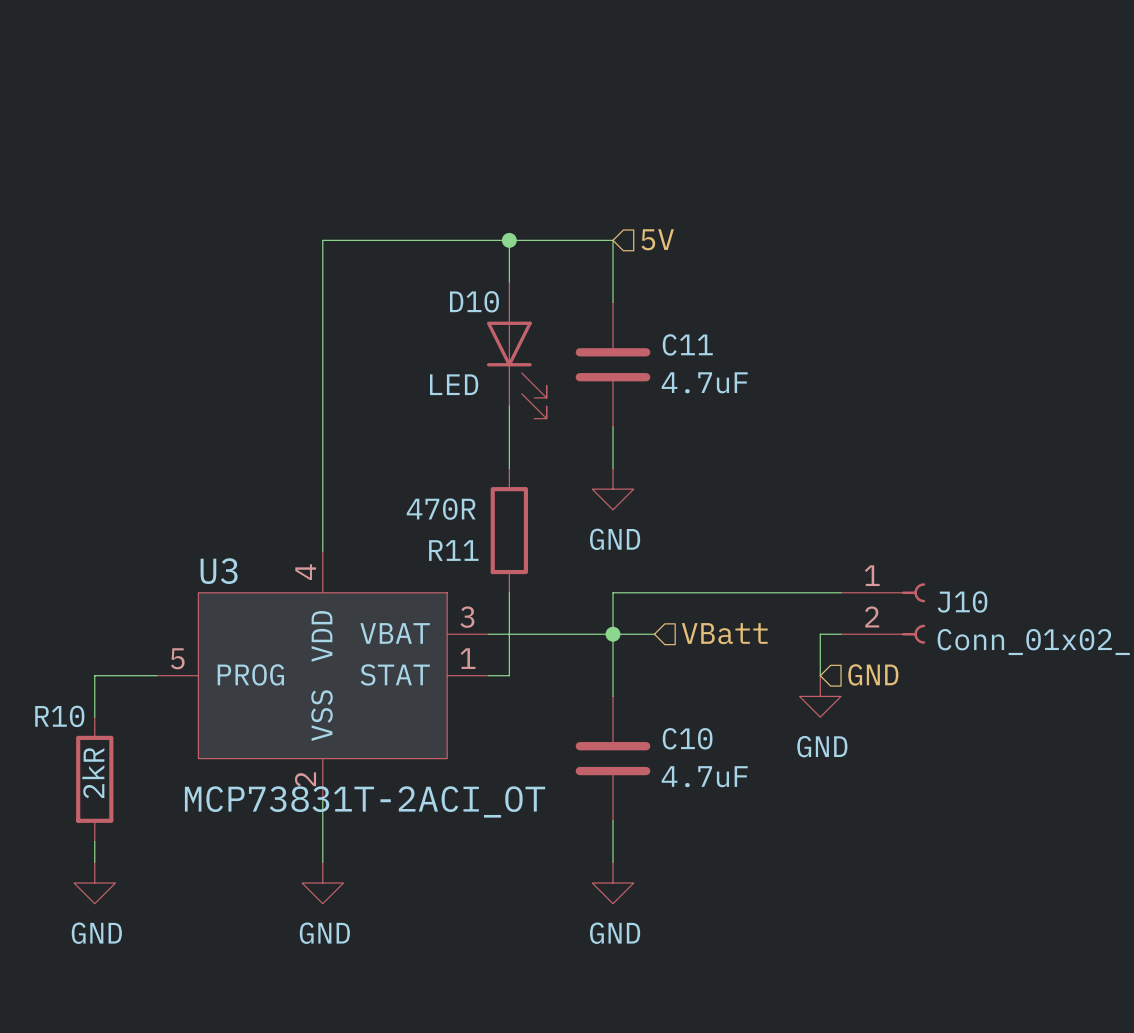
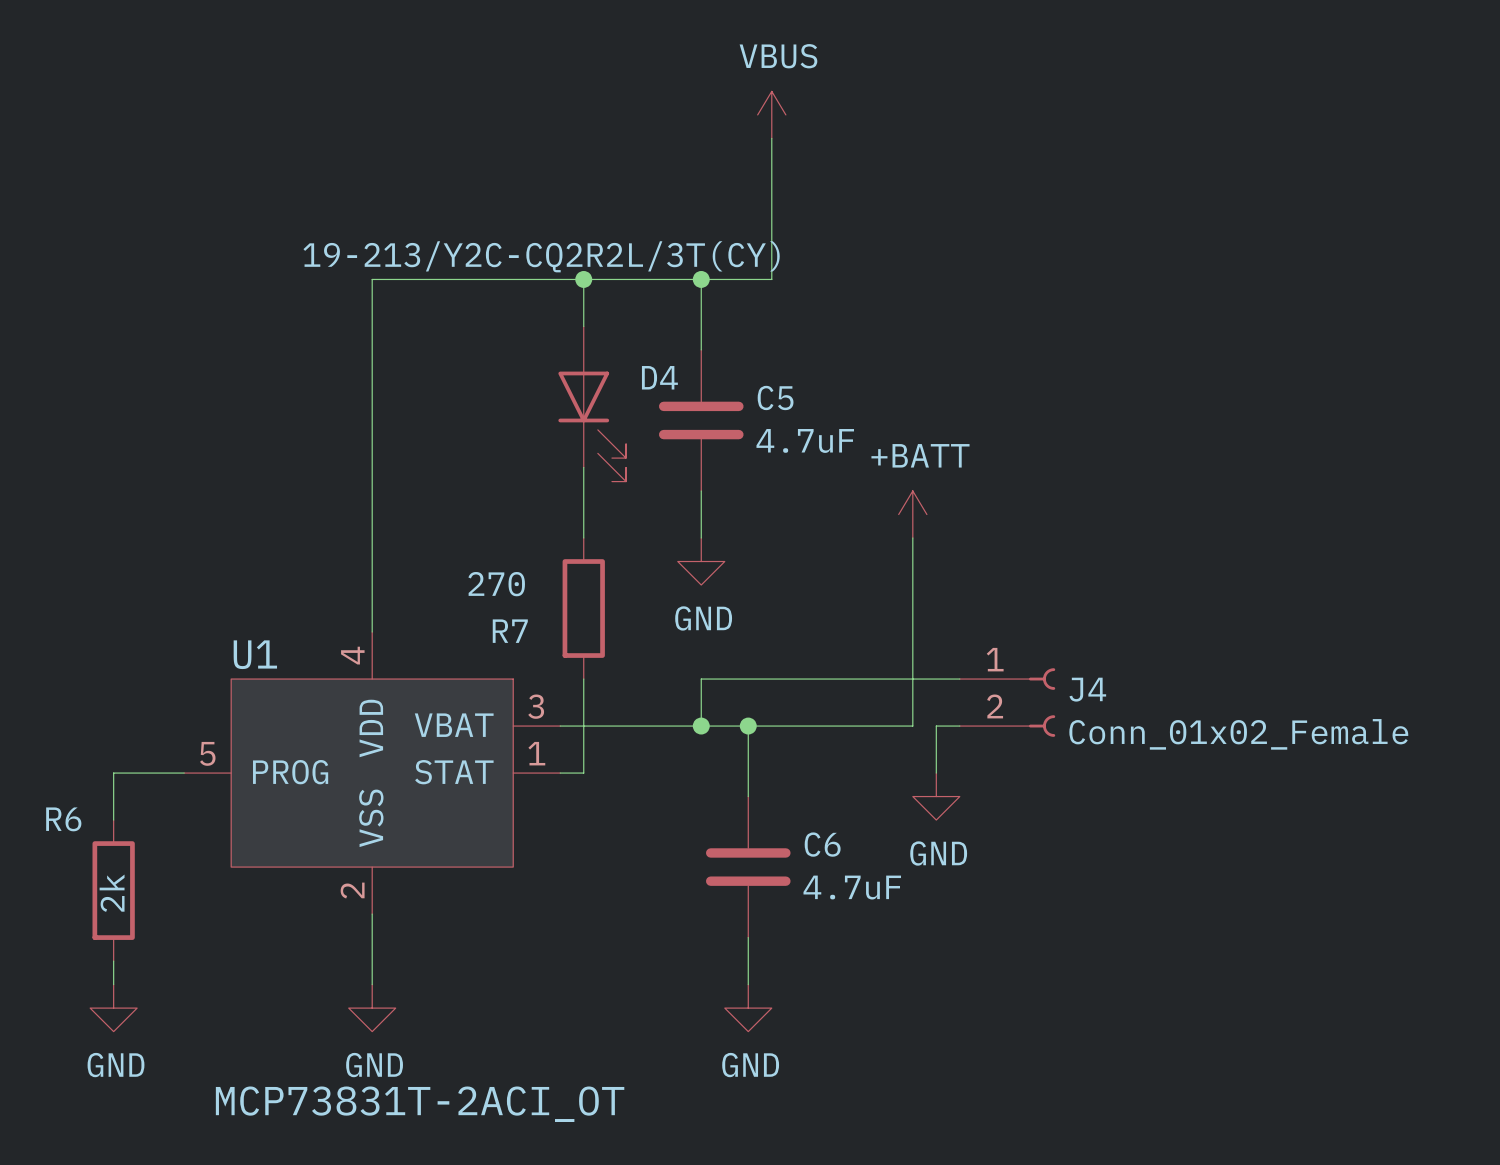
power symbol: none -> VBUS (771, 114)
wire: none -> (771, 138) (771, 279) (701, 279)
hierarchical label: 5V (657, 239) -> none
junction: none -> (701, 279)
D10 name: D10 (474, 301) -> D4 (659, 377)
C11 name: C11 (687, 344) -> C5 (775, 397)
D10 value: LED (454, 384) -> 19-213/Y2C-CQ2R2L/3T(CY) (541, 256)
power symbol: none -> +BATT (912, 514)
wire: none -> (912, 538) (912, 726) (748, 726) (748, 796)
R11 value: 470R (441, 509) -> 270 (496, 584)
R11 name: R11 (453, 550) -> R7 (510, 631)
U3 name: U3 (219, 571) -> U1 (255, 654)
J10 name: J10 (962, 601) -> J4 (1087, 689)
hierarchical label: VBatt (724, 633) -> none
wire: (613, 634) (613, 696) -> none
junction: none -> (748, 726)
hierarchical label: GND (873, 674) -> none
R10 name: R10 (59, 716) -> R6 (63, 819)
C10: 4.7uF (613, 758) -> none
C6: none -> 4.7uF (748, 867)
R10 value: 2kR (93, 773) -> 2k (112, 893)
U3 value position: MCP73831T-2ACI_OT (365, 801) -> MCP73831T-2ACI_OT (420, 1104)
wire: (613, 820) (613, 862) -> (748, 937) (748, 984)
power symbol position: GND (613, 883) -> GND (748, 1008)

